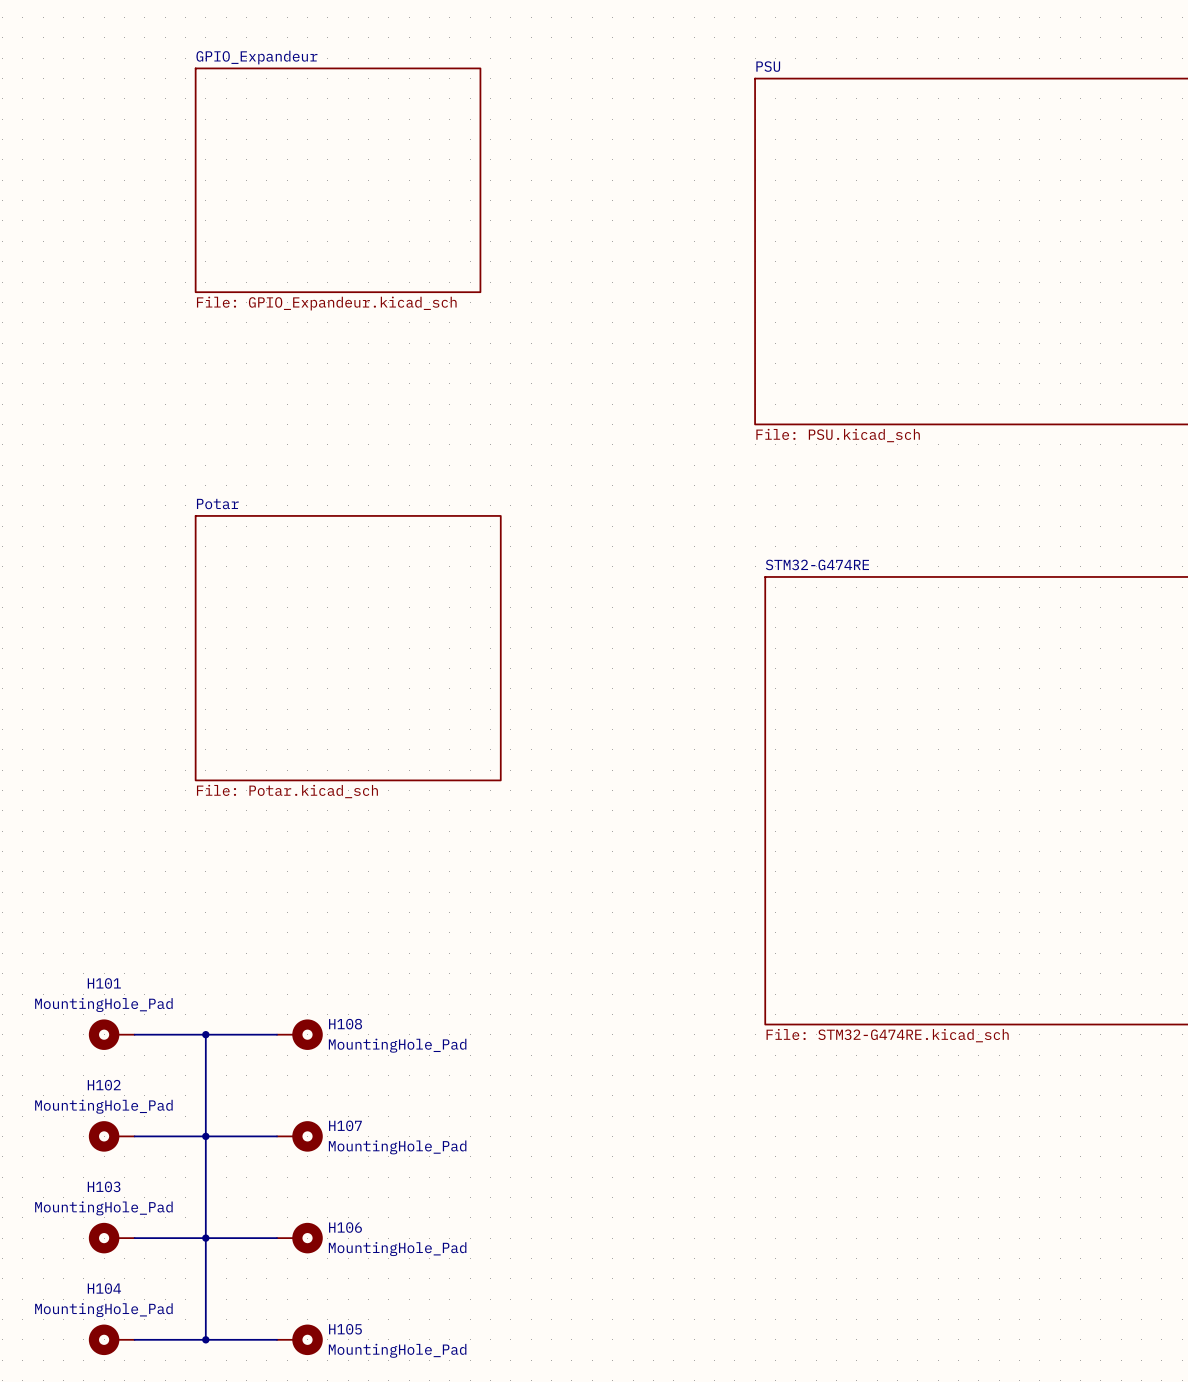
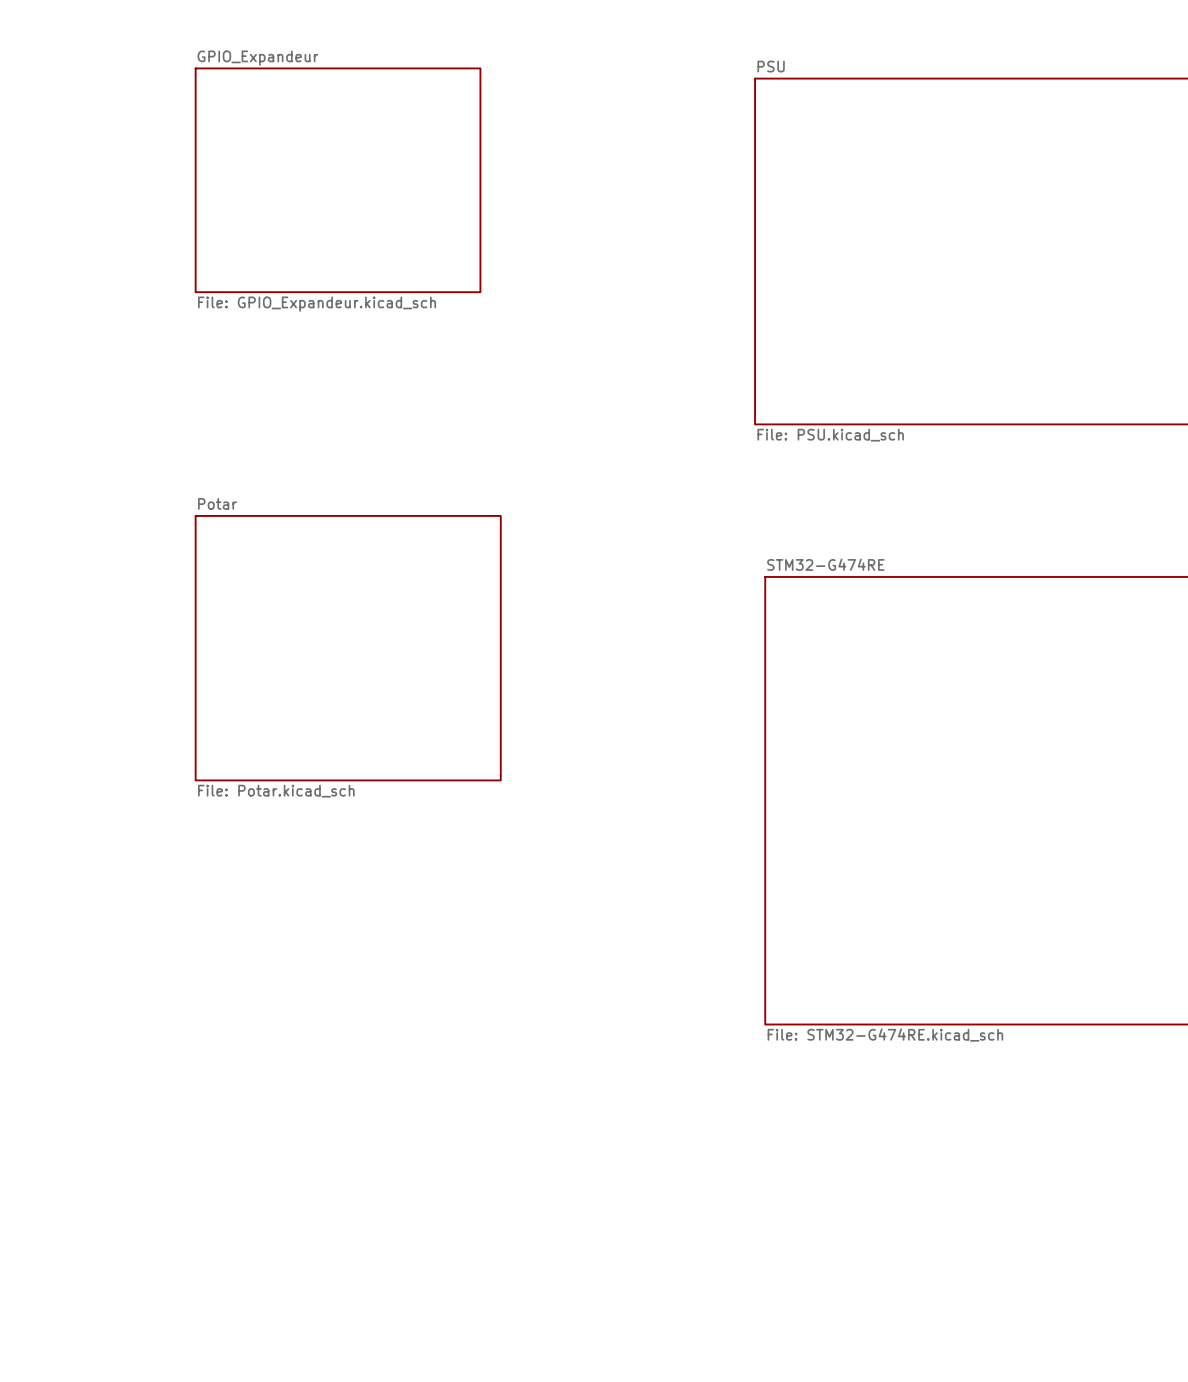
H101: MountingHole_Pad (111, 1034) -> none
wire: (134, 1034) (277, 1034) -> none
wire: (205, 1034) (205, 1339) -> none
junction: (205, 1034) -> none
H108: MountingHole_Pad (299, 1034) -> none
H102: MountingHole_Pad (111, 1136) -> none
wire: (134, 1136) (277, 1136) -> none
junction: (205, 1136) -> none
H107: MountingHole_Pad (299, 1136) -> none
H103: MountingHole_Pad (111, 1238) -> none
wire: (134, 1238) (277, 1238) -> none
junction: (205, 1238) -> none
H106: MountingHole_Pad (299, 1238) -> none
H104: MountingHole_Pad (111, 1339) -> none
wire: (134, 1339) (277, 1339) -> none
junction: (205, 1339) -> none
H105: MountingHole_Pad (299, 1339) -> none

